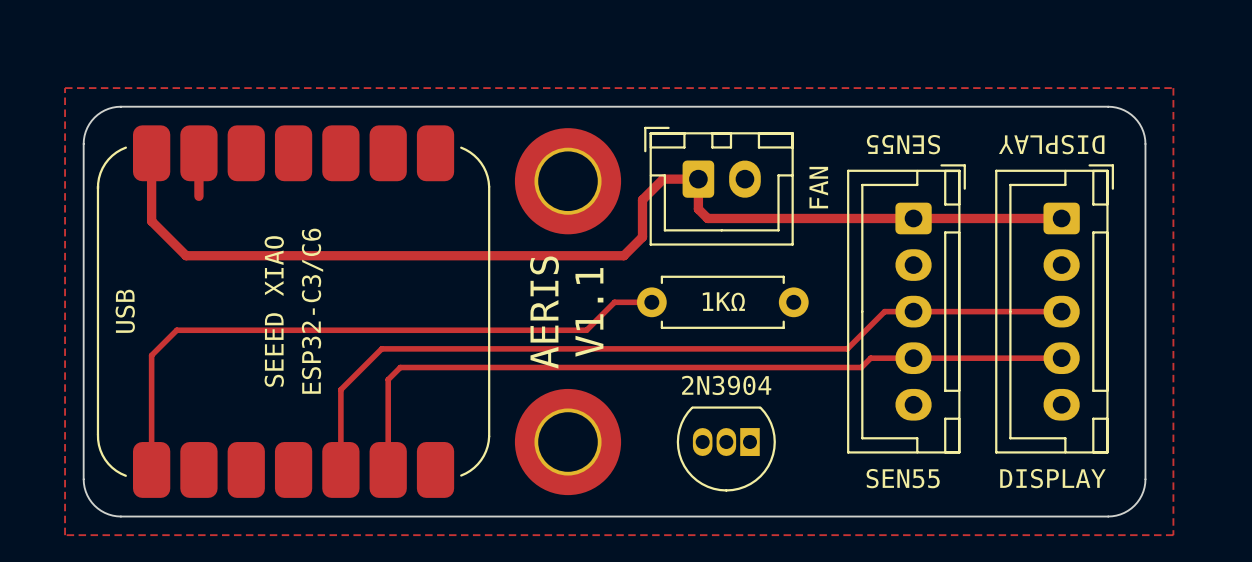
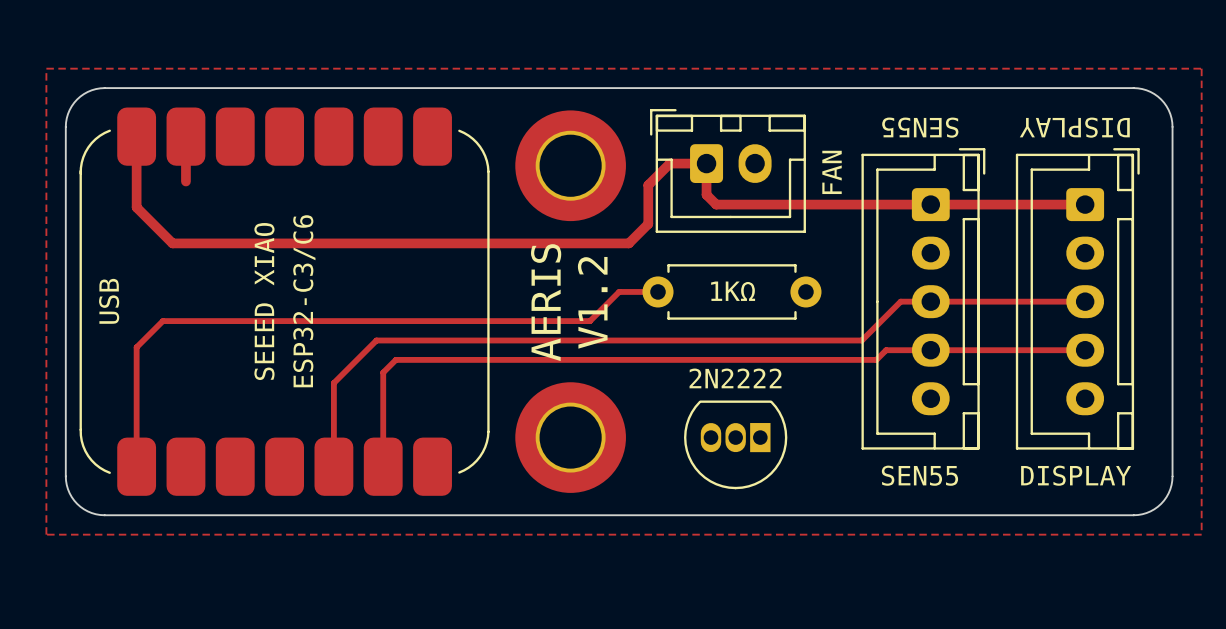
text: V1.1 (589, 312) -> V1.2 (592, 302)
text: 2N3904 (726, 385) -> 2N2222 (735, 378)

